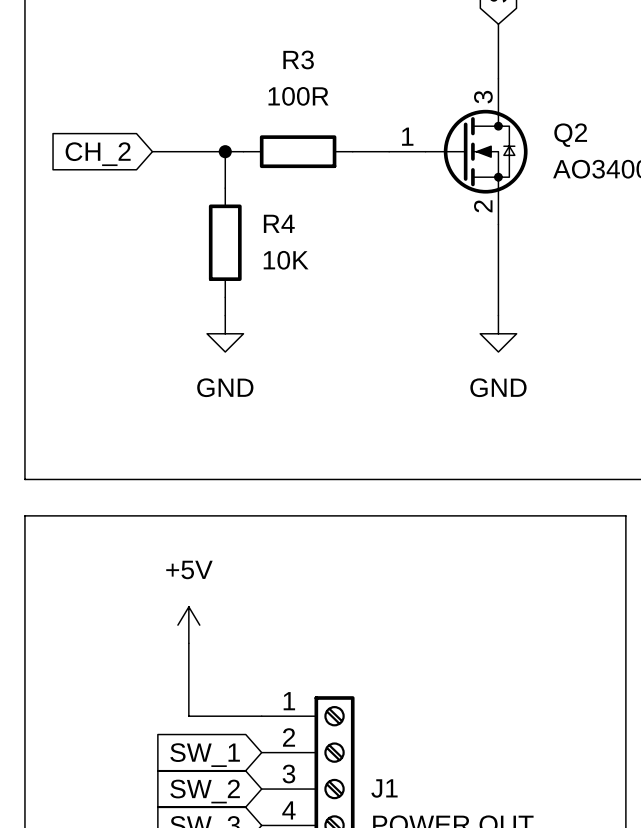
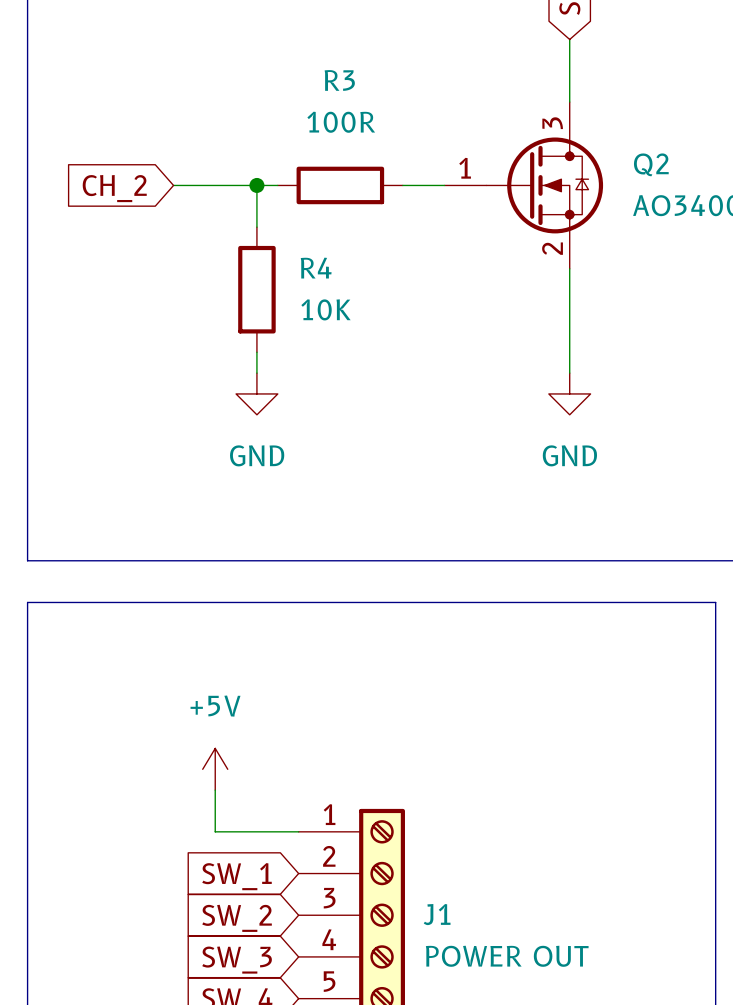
power symbol position: +5V (188, 625) -> +5V (215, 769)

